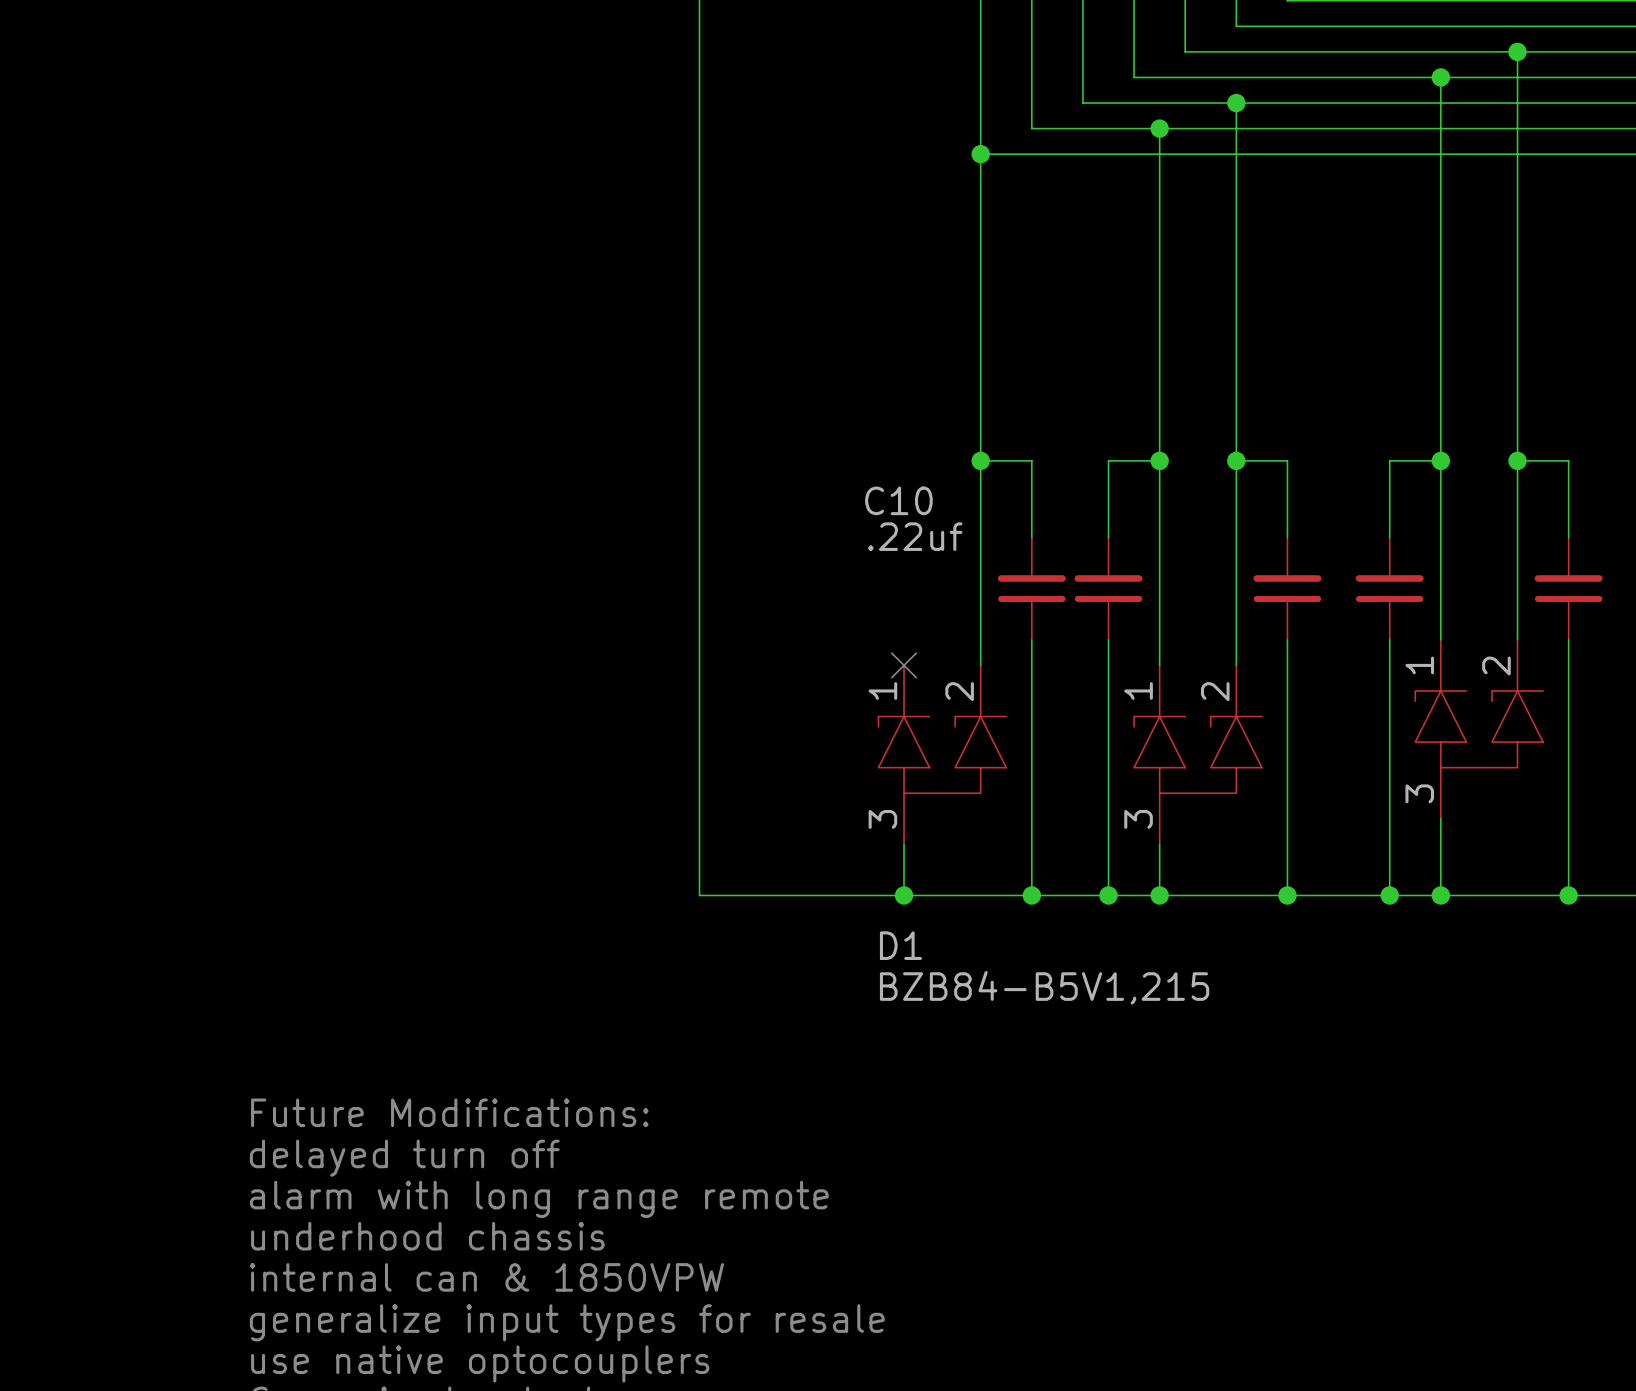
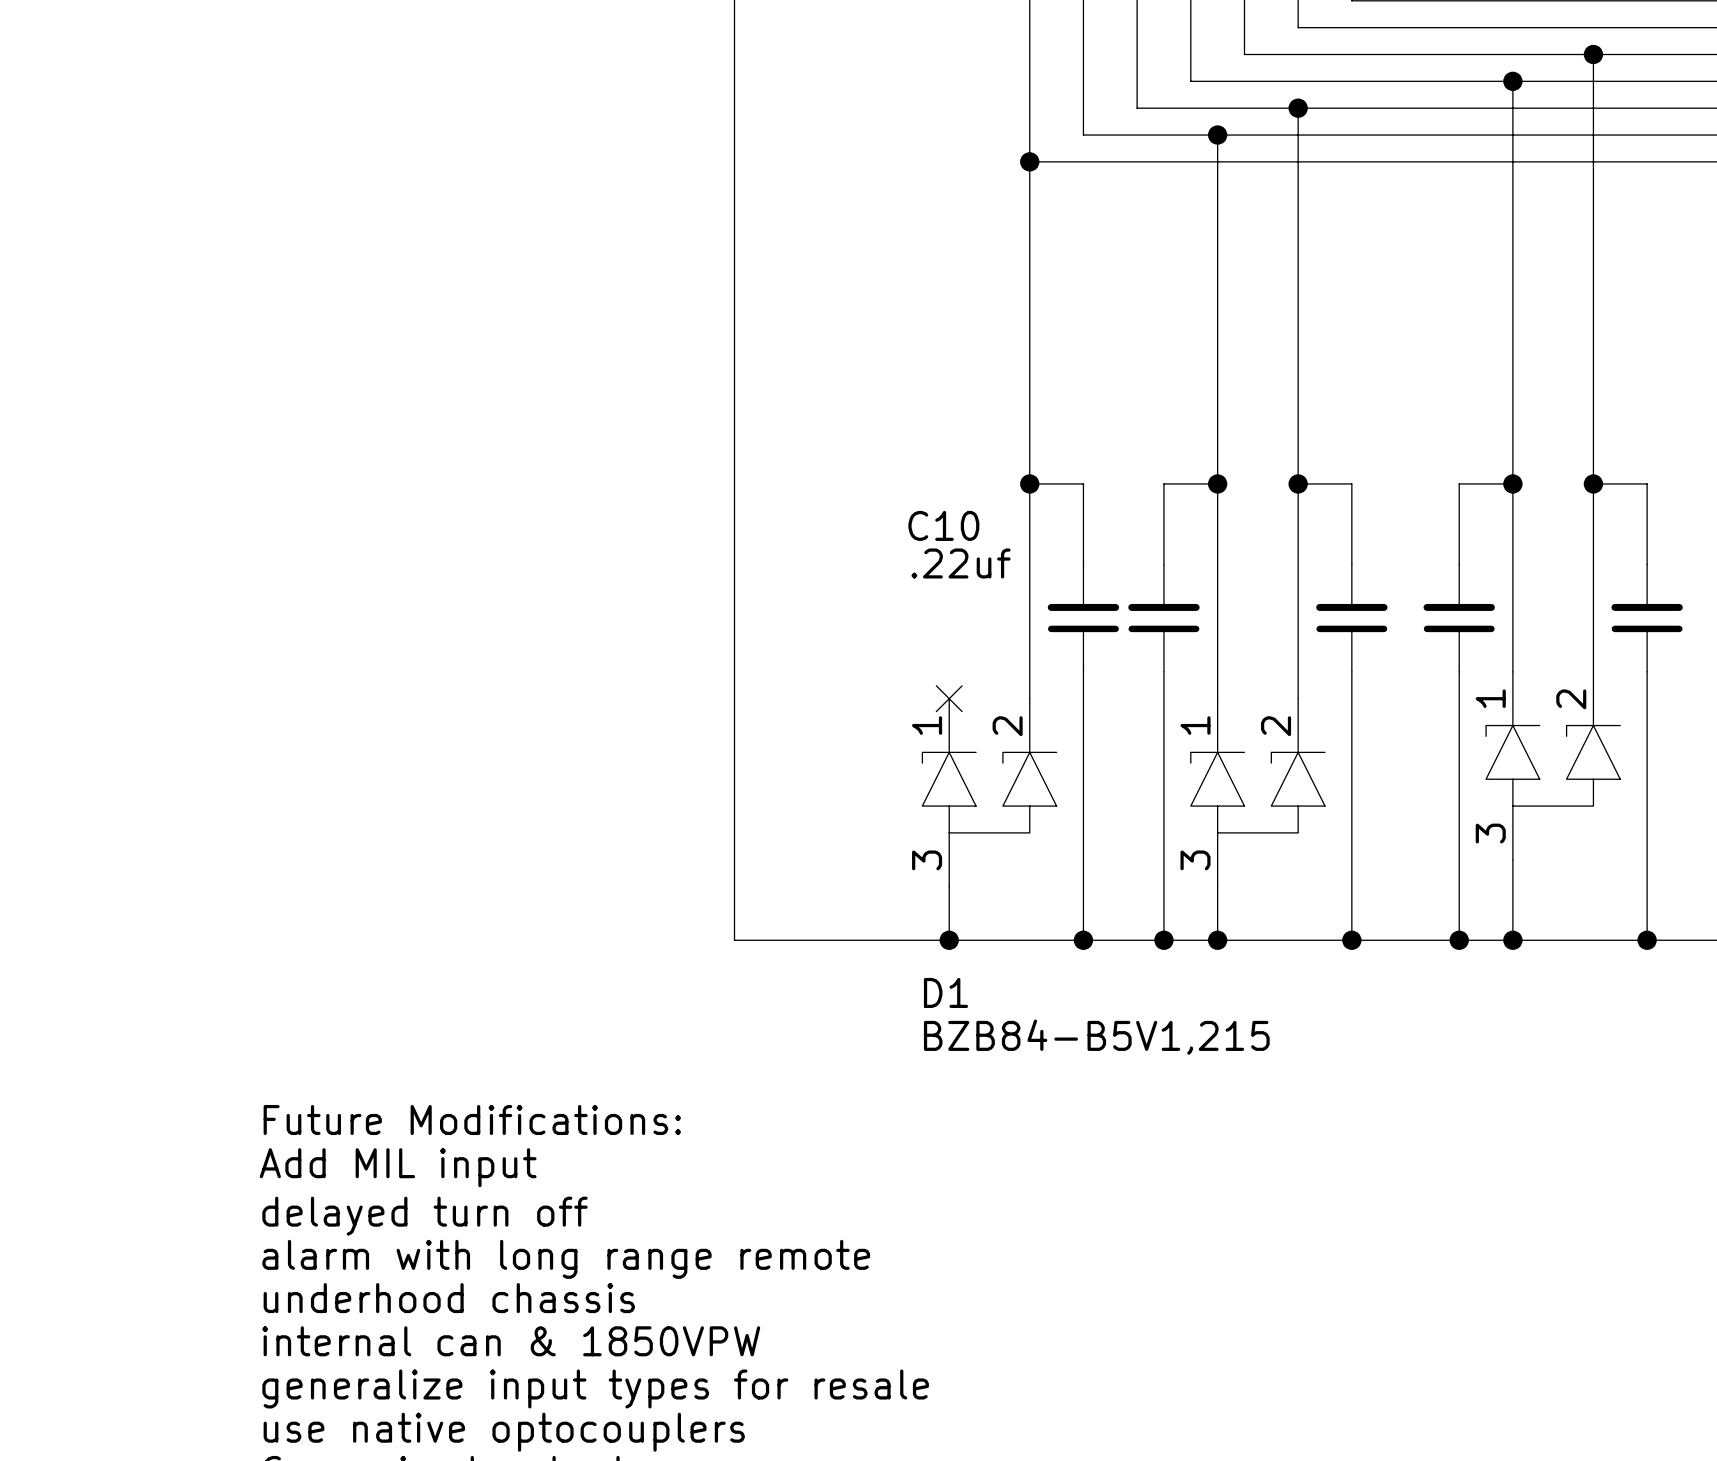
text: none -> Future Modifications: (472, 1119)
text: Future Modifications: (449, 1112) -> Add MIL input (398, 1167)

